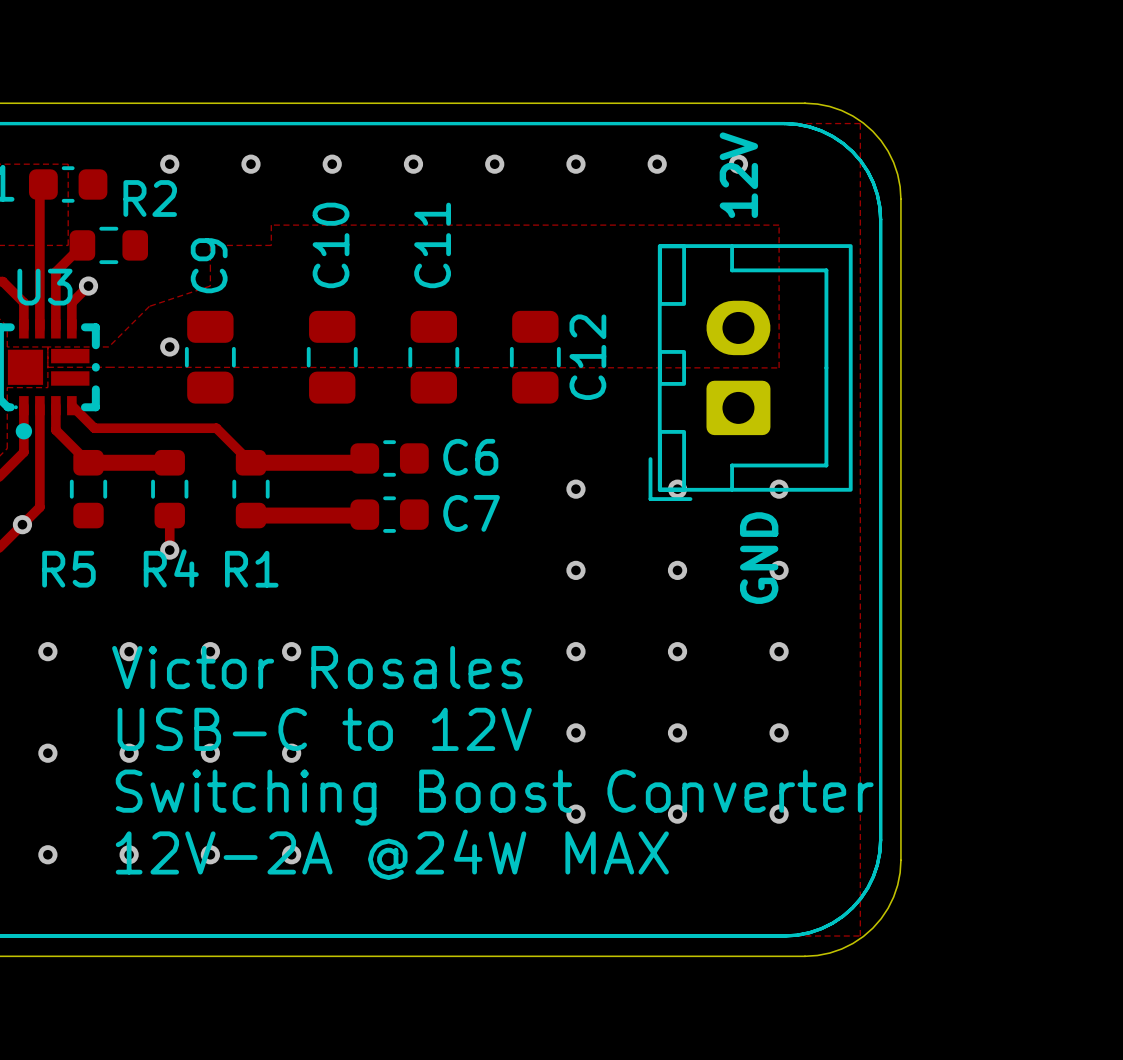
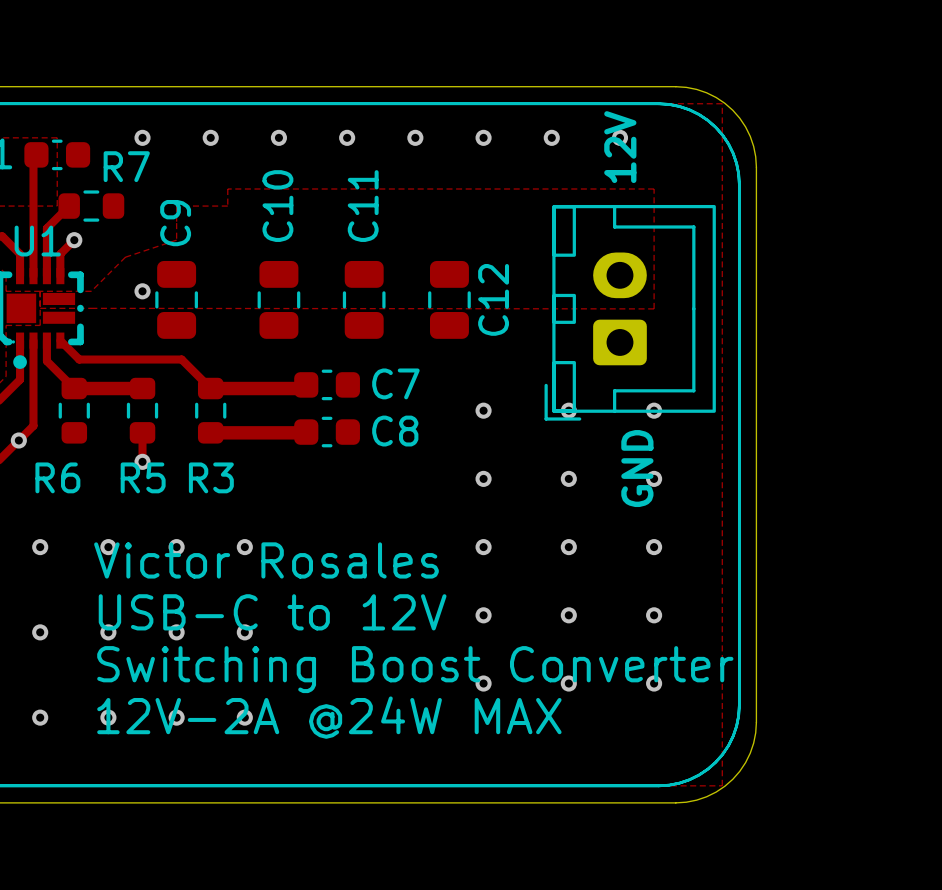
R2 name: R2 (150, 198) -> R7 (126, 166)
U3 name: U3 (44, 287) -> U1 (37, 241)
C6 name: C6 (470, 457) -> C7 (395, 383)
C7 name: C7 (471, 513) -> C8 (395, 431)
R4 name: R4 (171, 568) -> R5 (143, 477)
R5 name: R5 (68, 569) -> R6 (57, 477)
R1 name: R1 (251, 569) -> R3 (211, 477)

